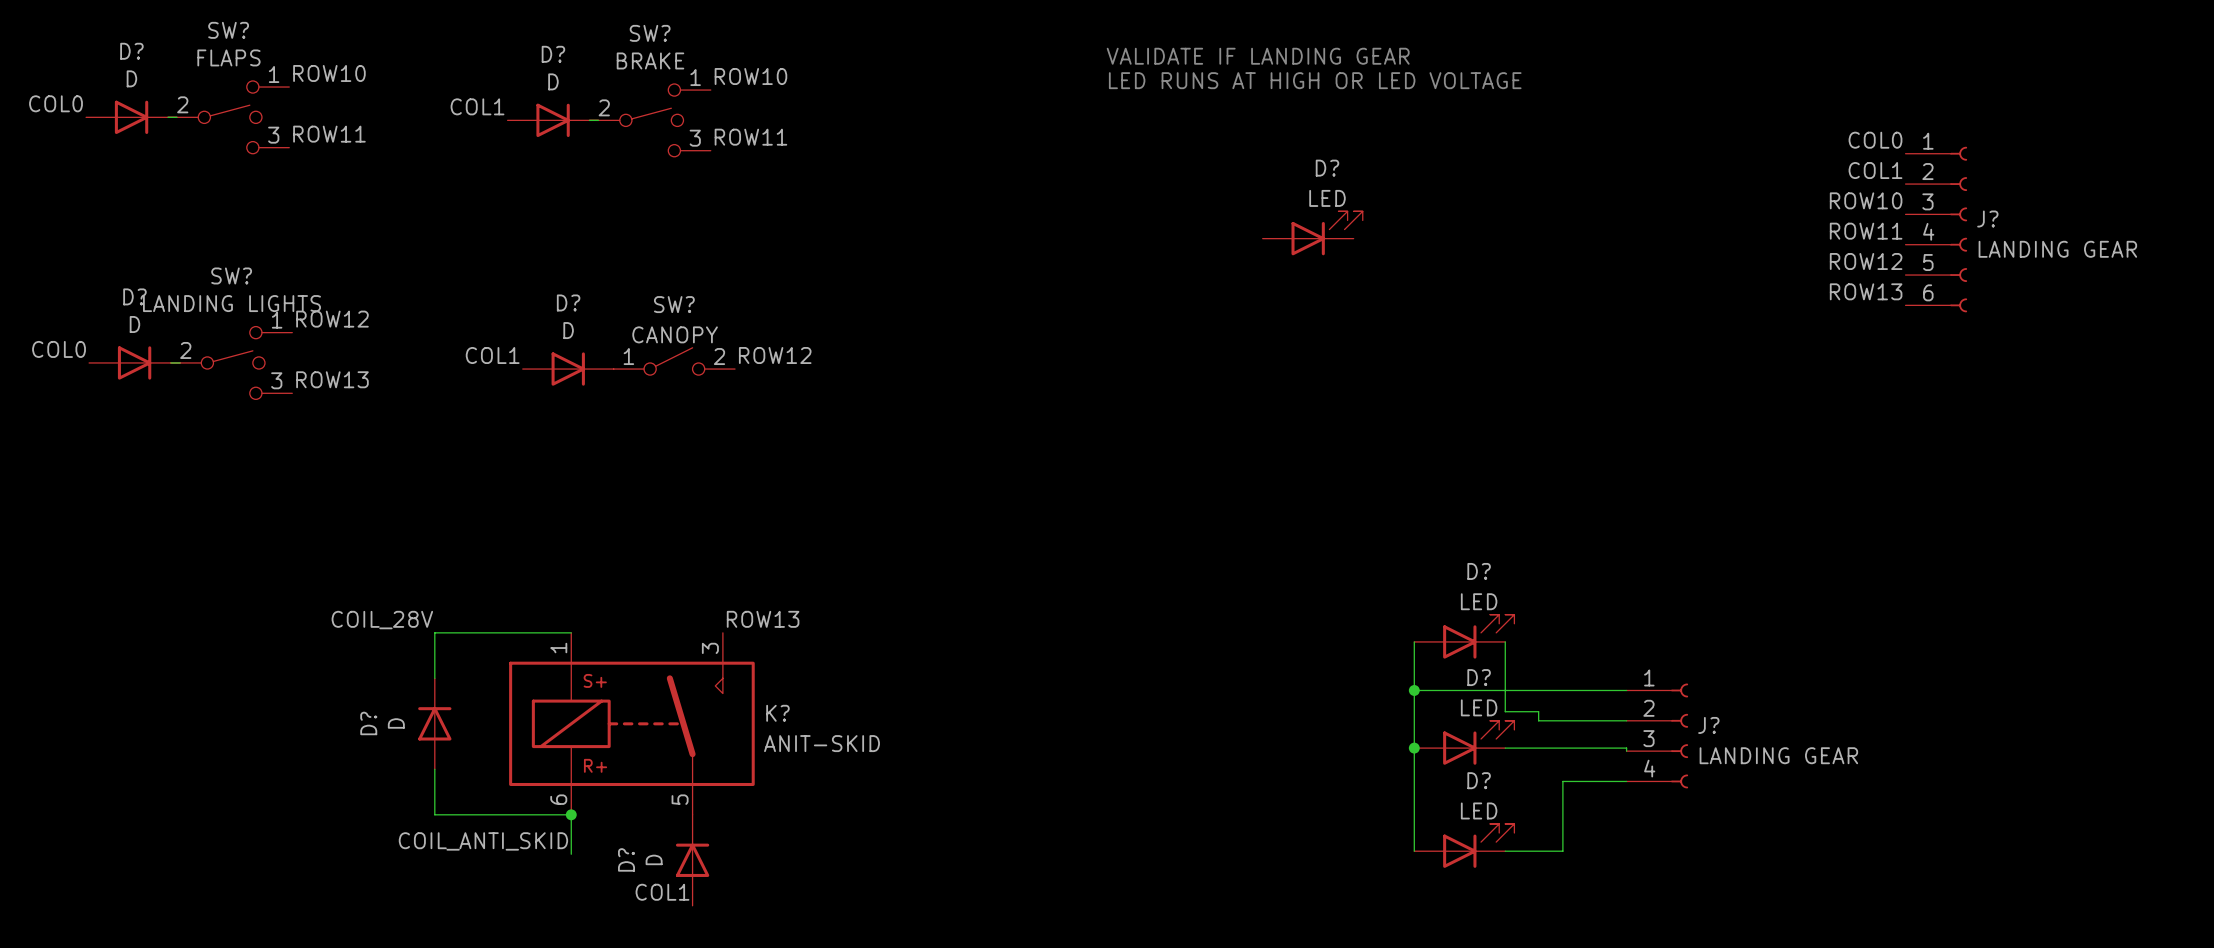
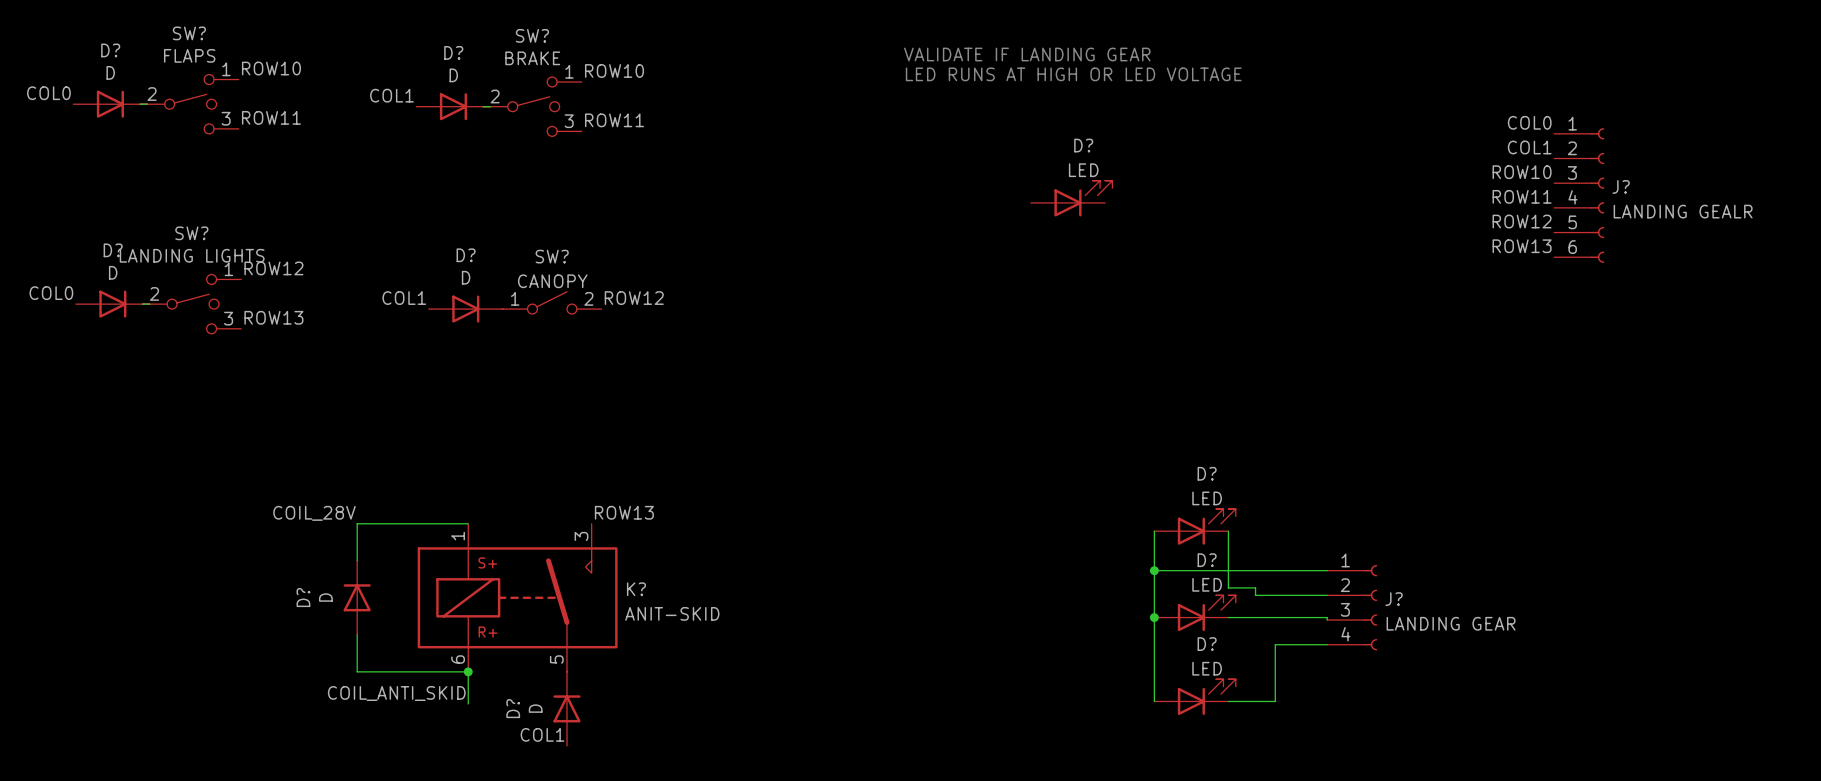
J? value: LANDING GEAR (2057, 249) -> LANDING GEALR (1683, 211)

